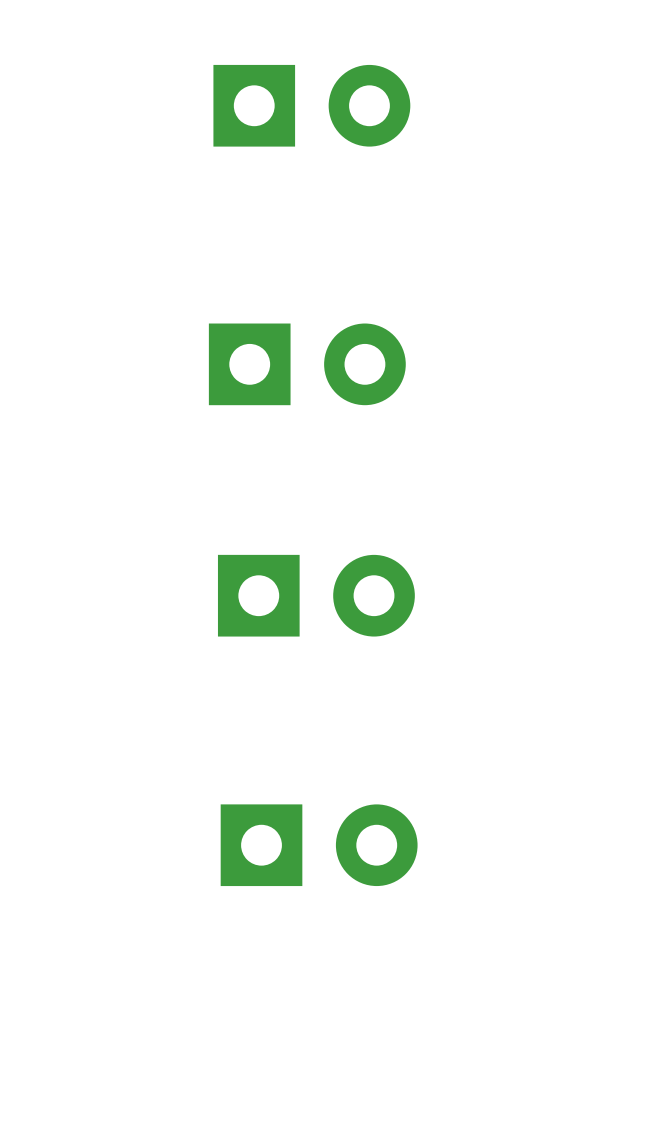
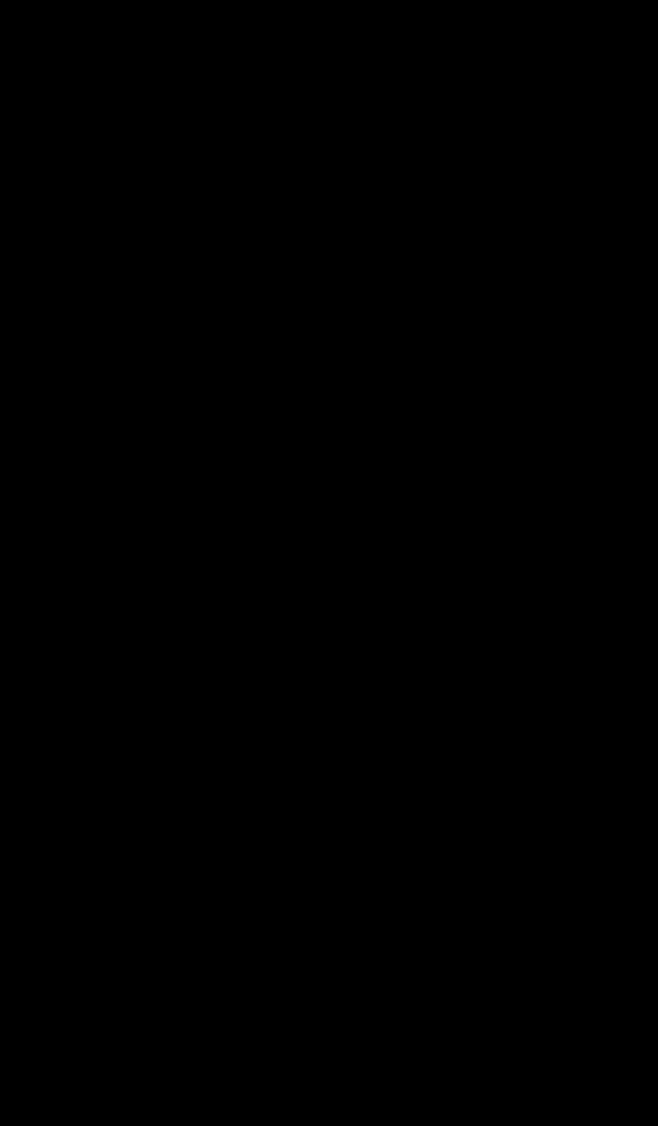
part: (311, 105) -> none
part: (307, 364) -> none
part: (316, 595) -> none
part: (319, 845) -> none

